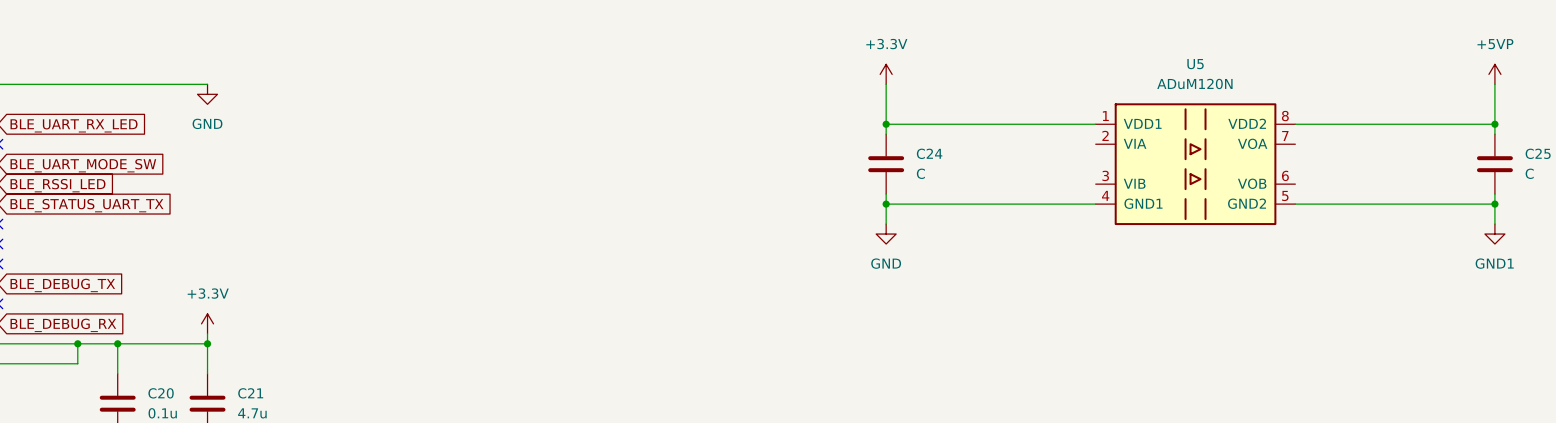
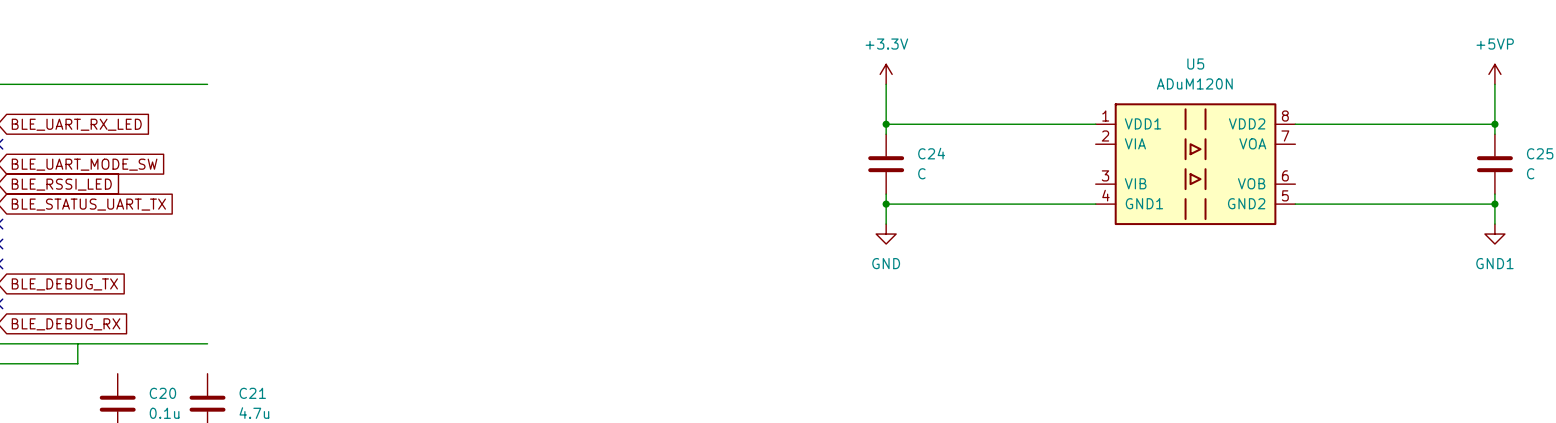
power symbol: GND (207, 94) -> none
power symbol: +3.3V (207, 323) -> none
wire: (207, 333) (207, 373) -> none
junction: (77, 343) -> none
wire: (117, 343) (117, 373) -> none
junction: (117, 343) -> none
junction: (207, 343) -> none

